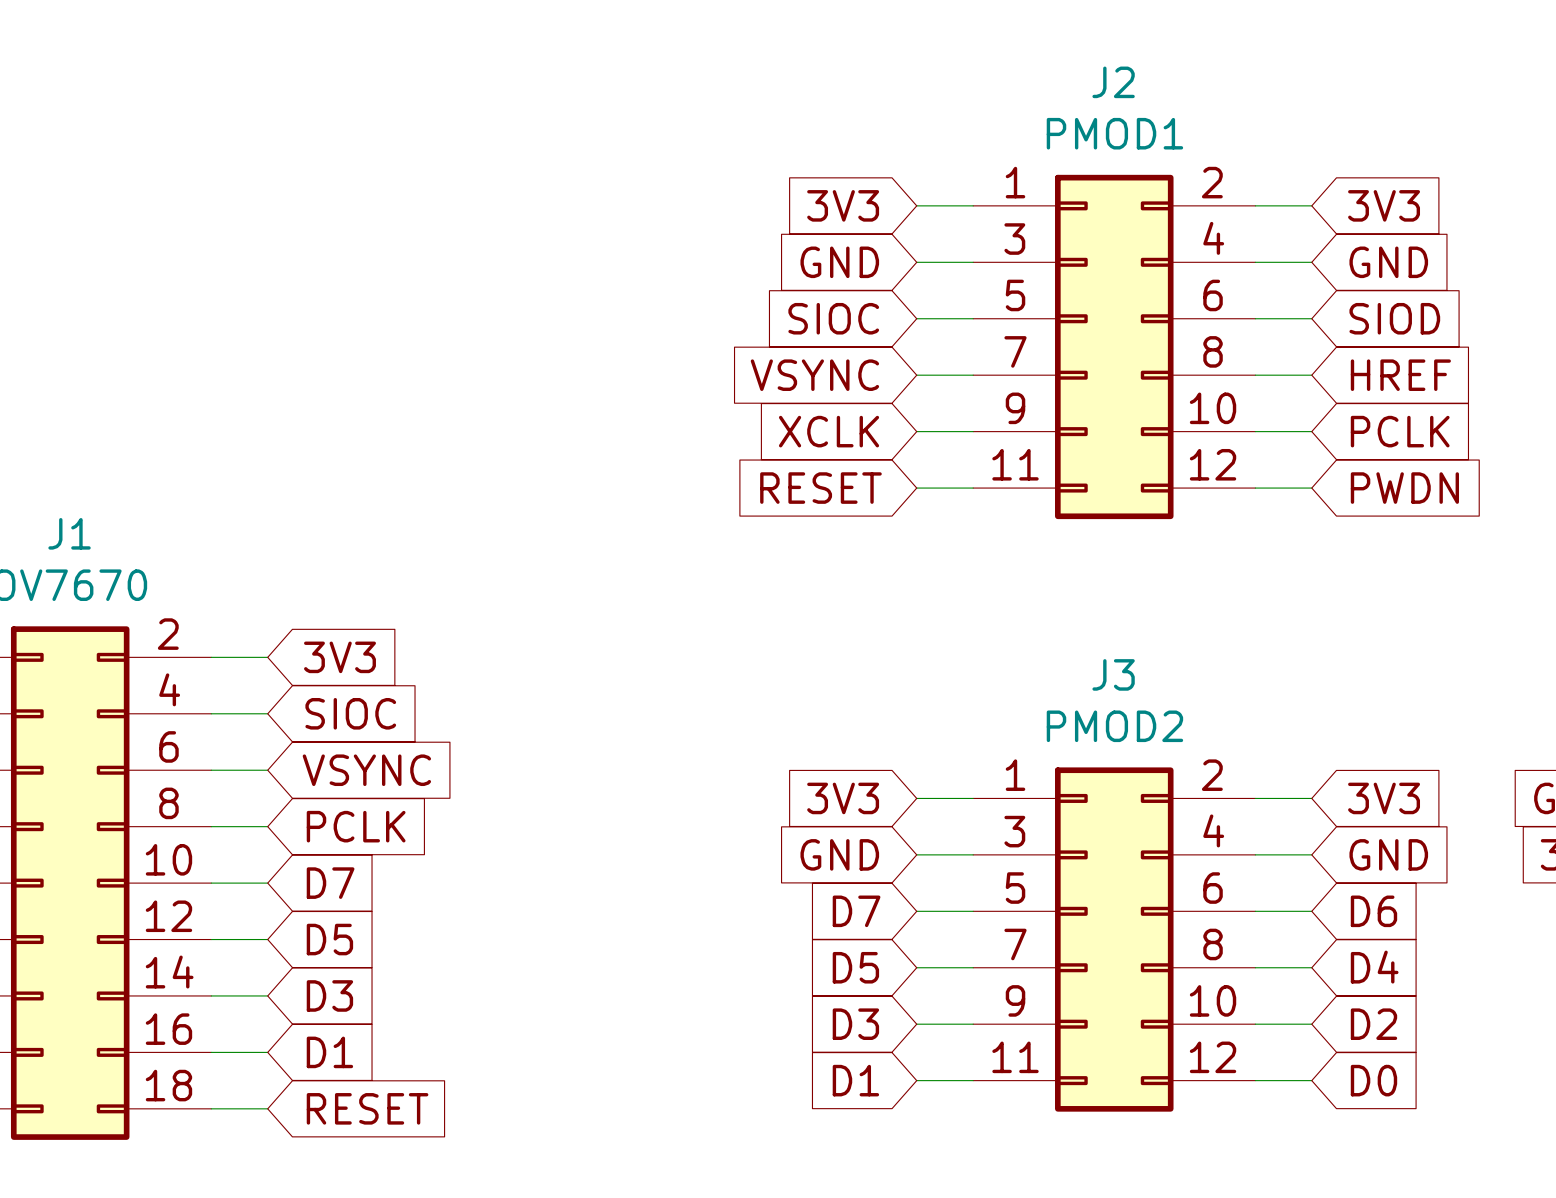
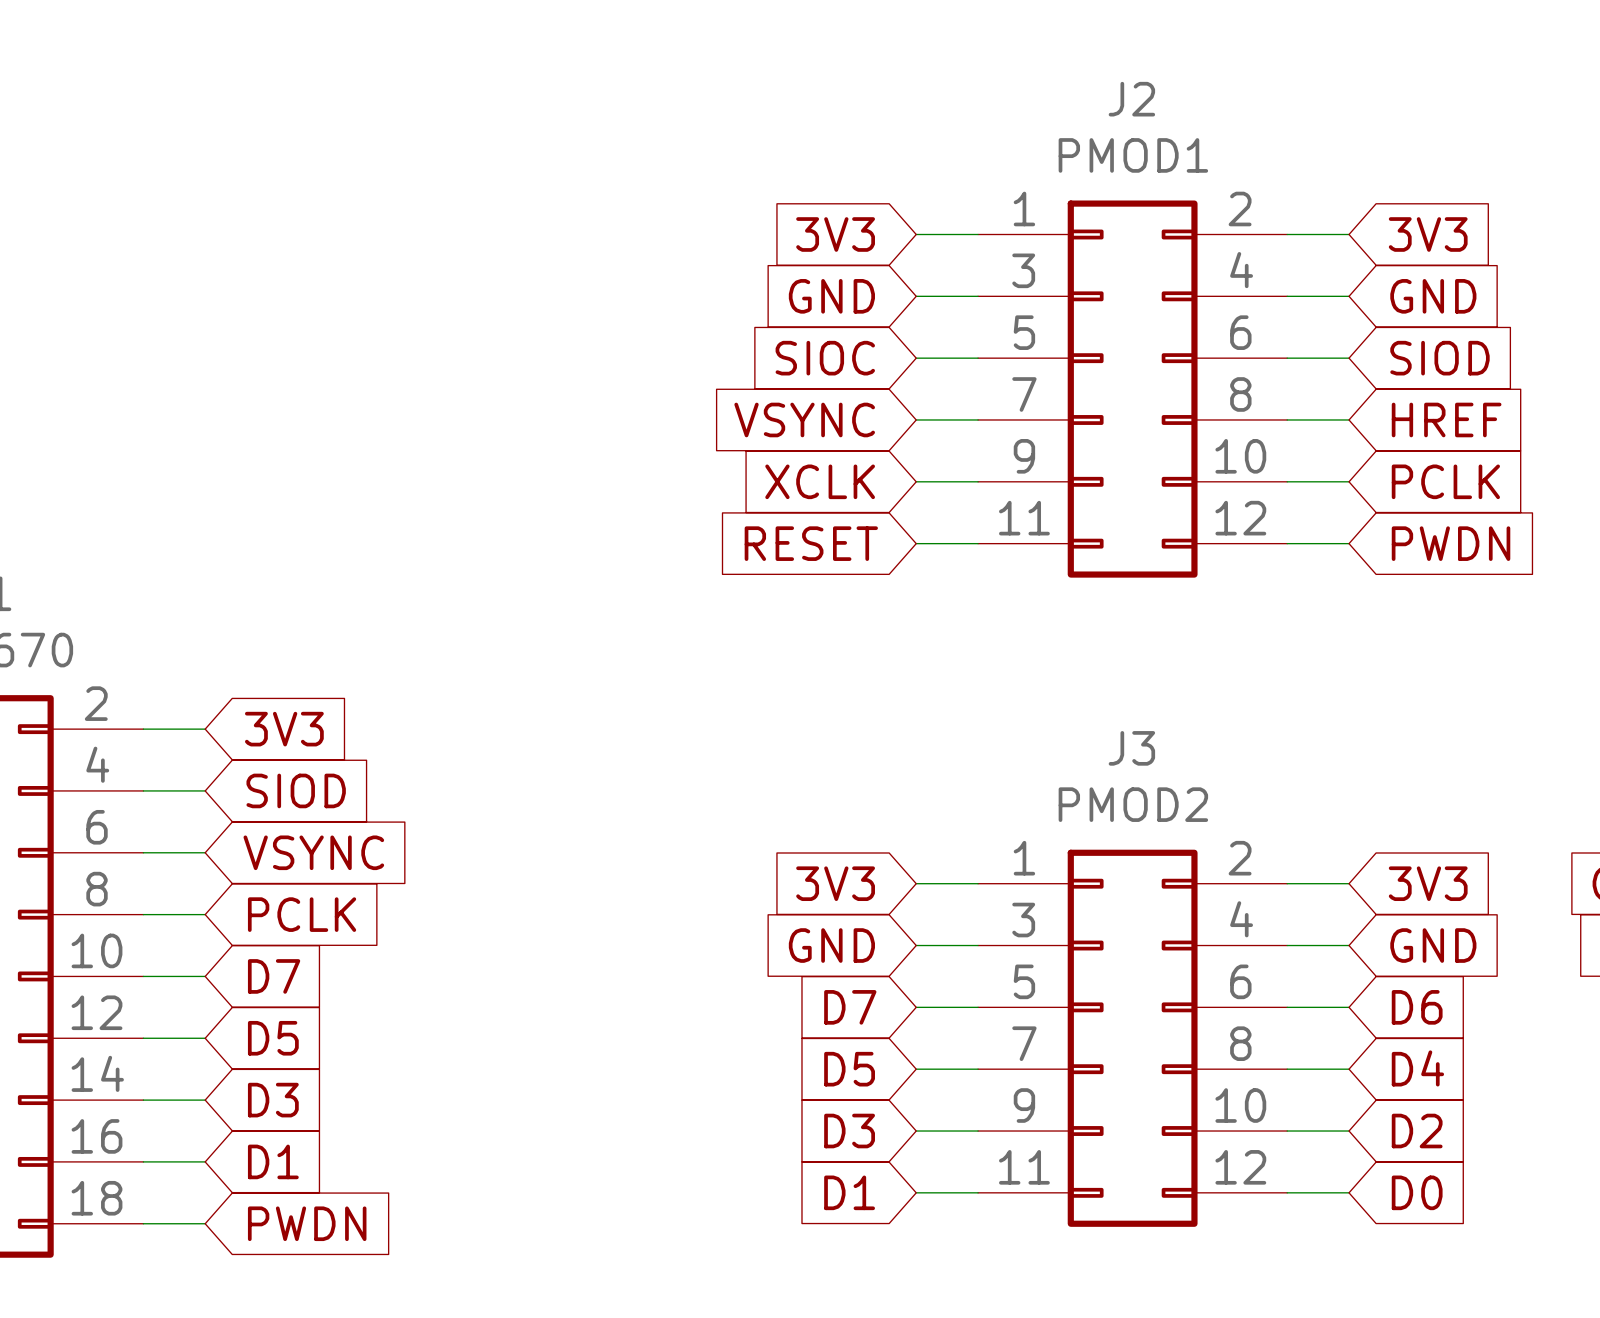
global label: SIOC (350, 713) -> SIOD (296, 790)
global label: RESET (367, 1108) -> PWDN (307, 1223)

